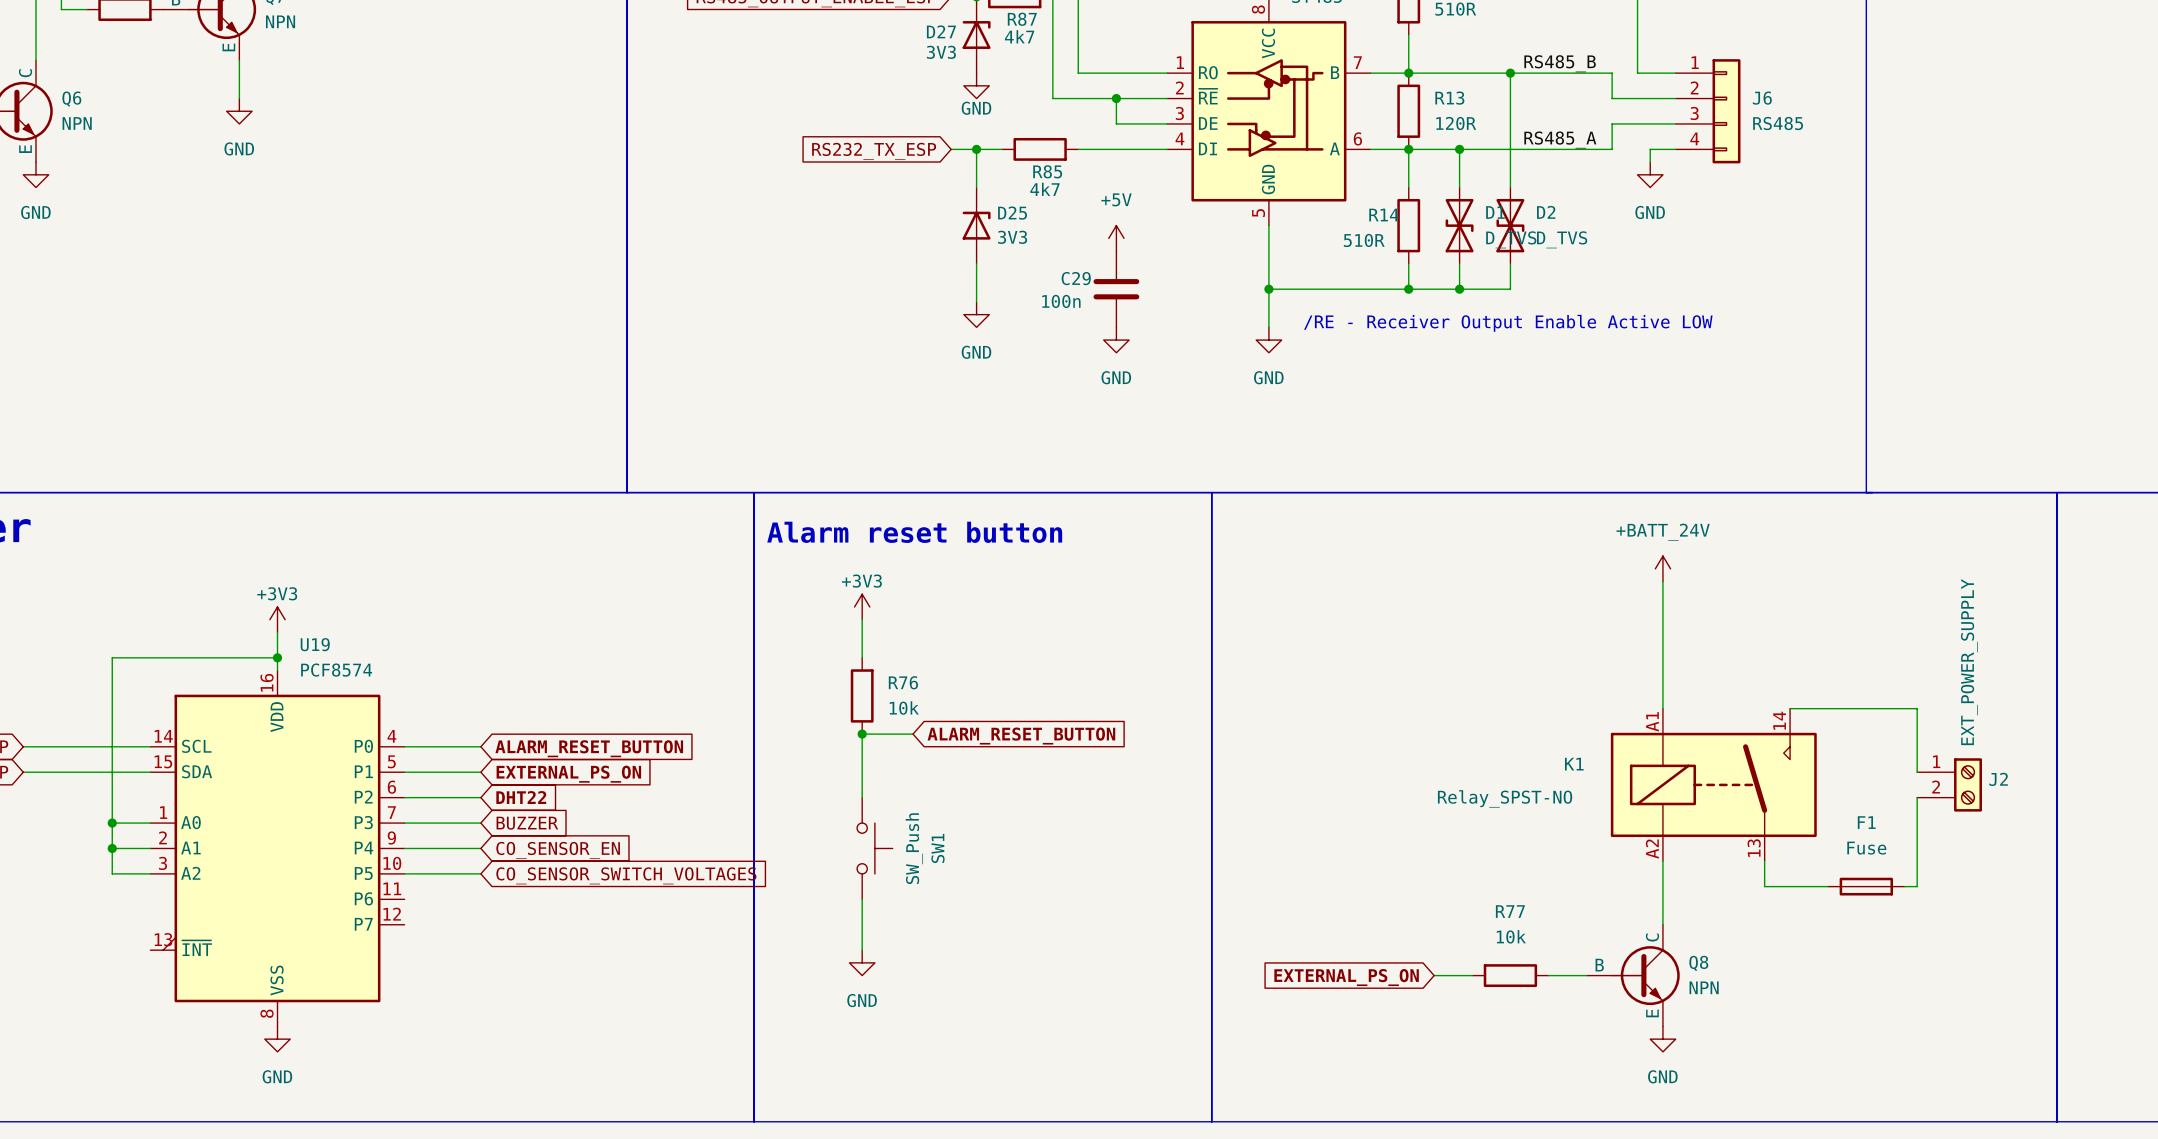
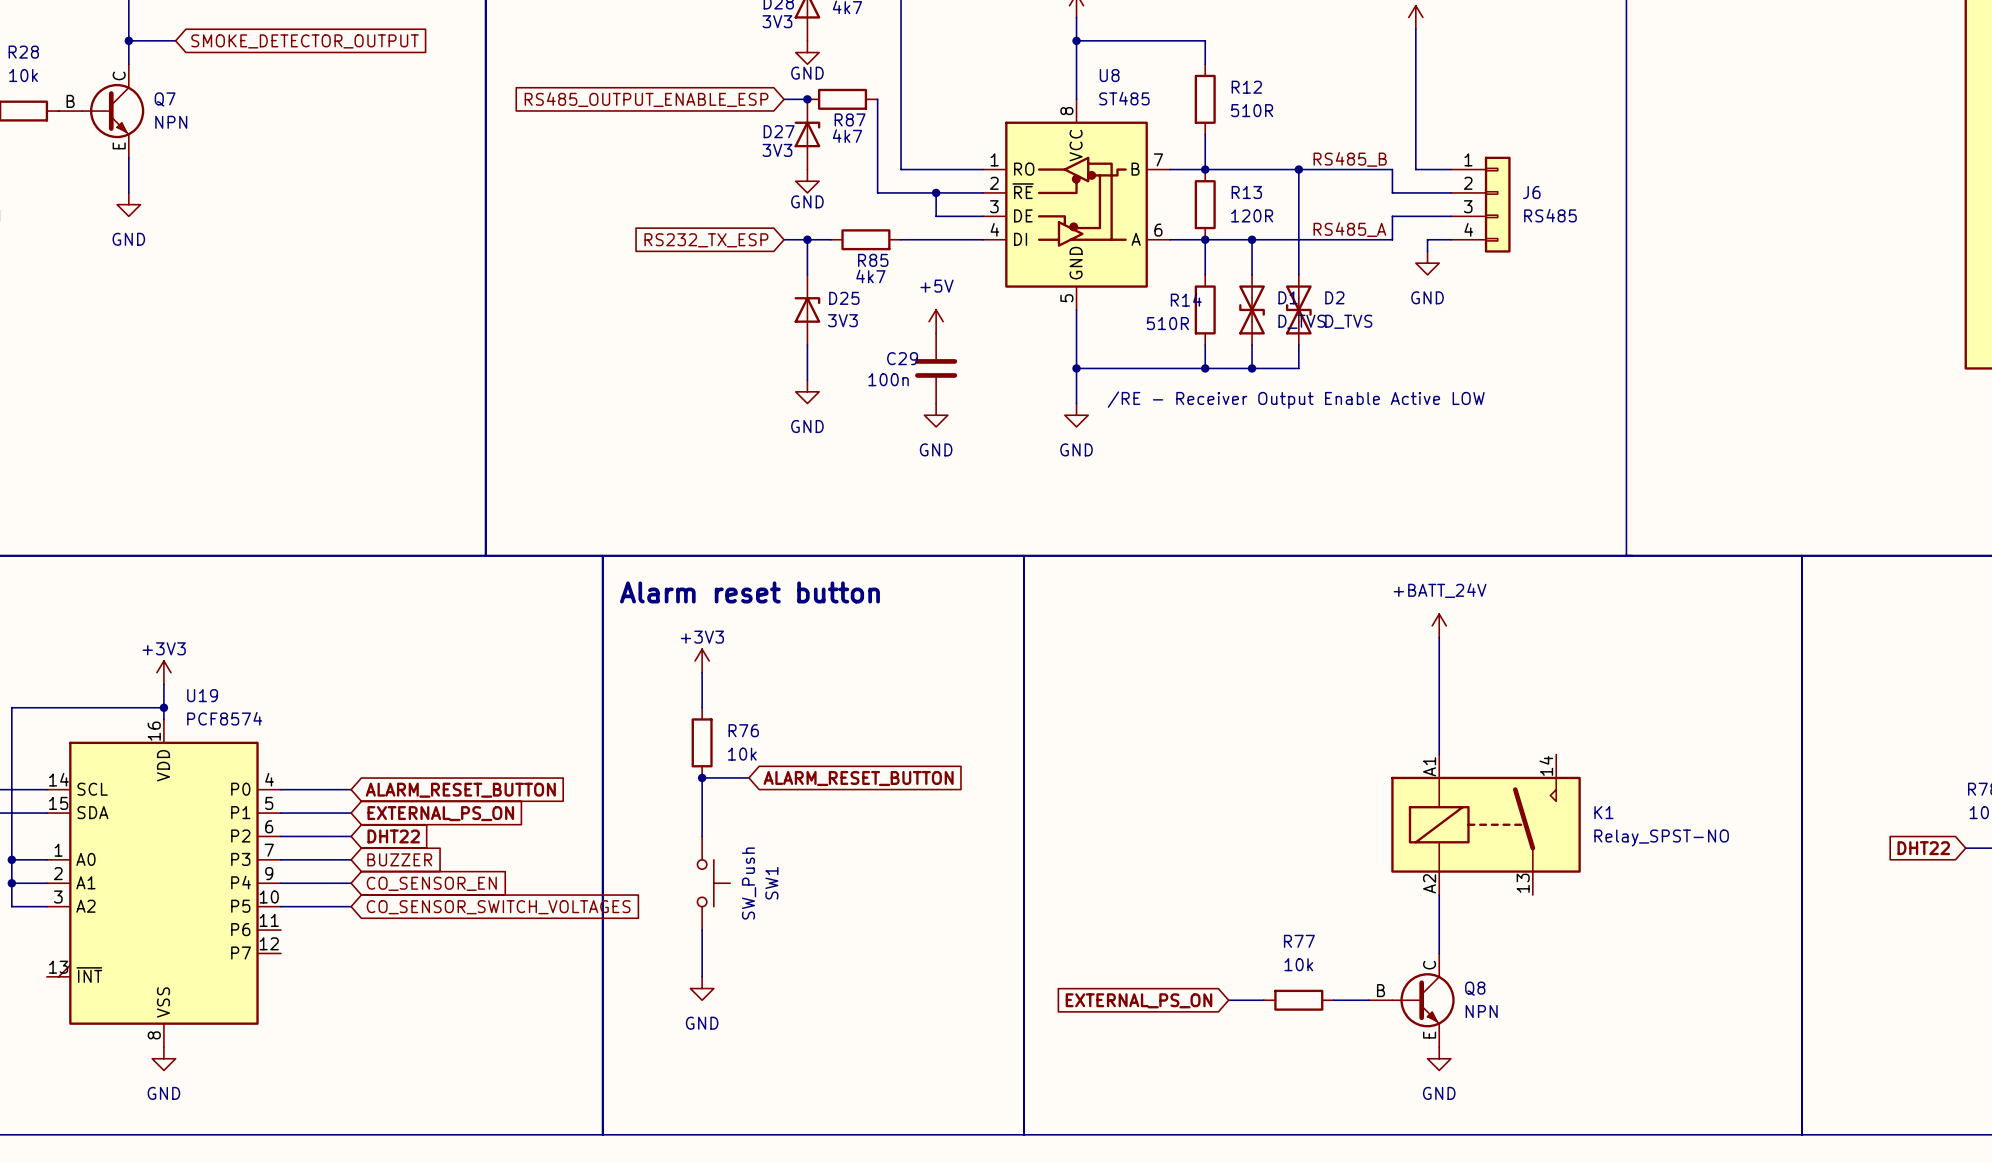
wire: (1790, 708) (1917, 708) (1917, 772) -> none
K1 name position: K1 (1574, 764) -> K1 (1603, 812)
J2: EXT_POWER_SUPPLY (1949, 784) -> none
wire: (1917, 797) (1917, 886) (1904, 886) -> none
K1 value position: Relay_SPST-NO (1505, 798) -> Relay_SPST-NO (1661, 837)
wire: (1764, 861) (1764, 886) (1828, 886) -> none
F1: Fuse (1866, 886) -> none

